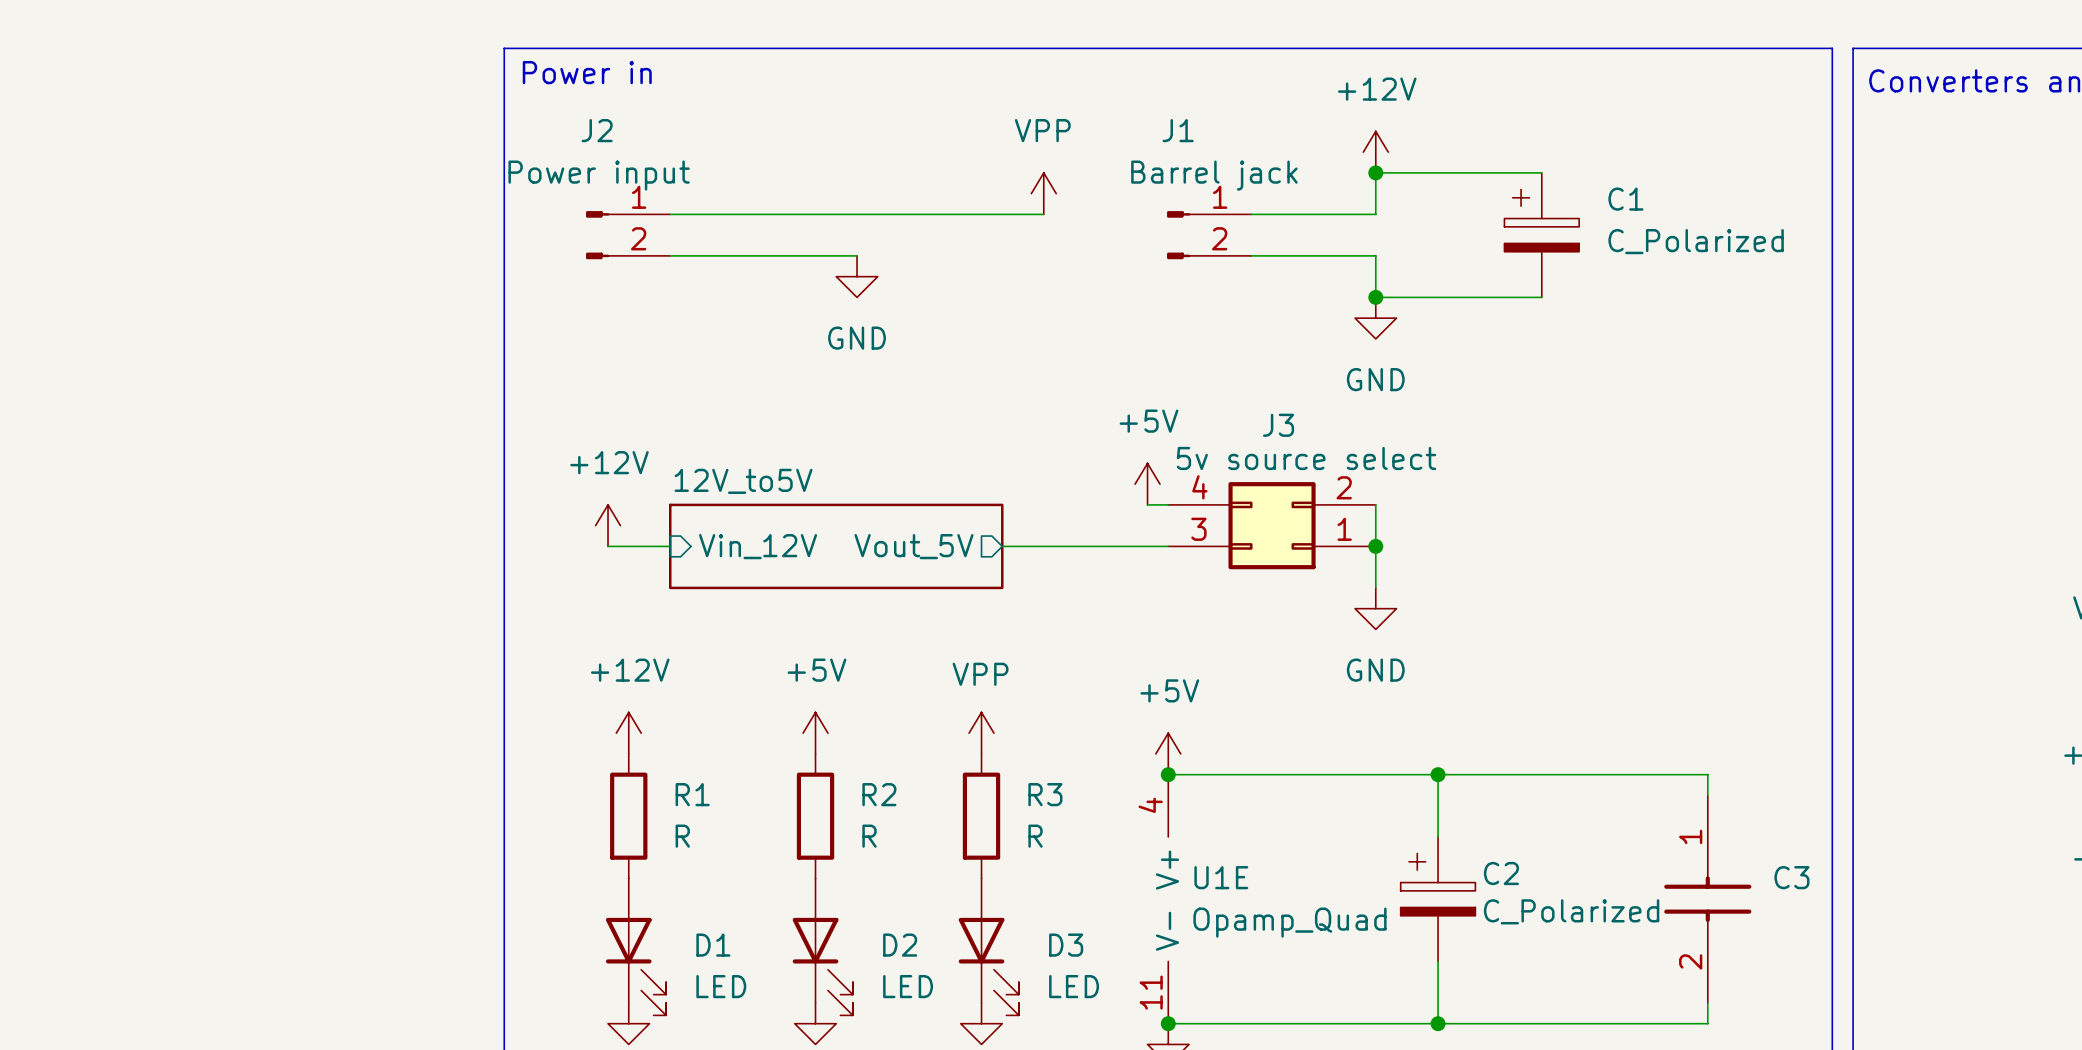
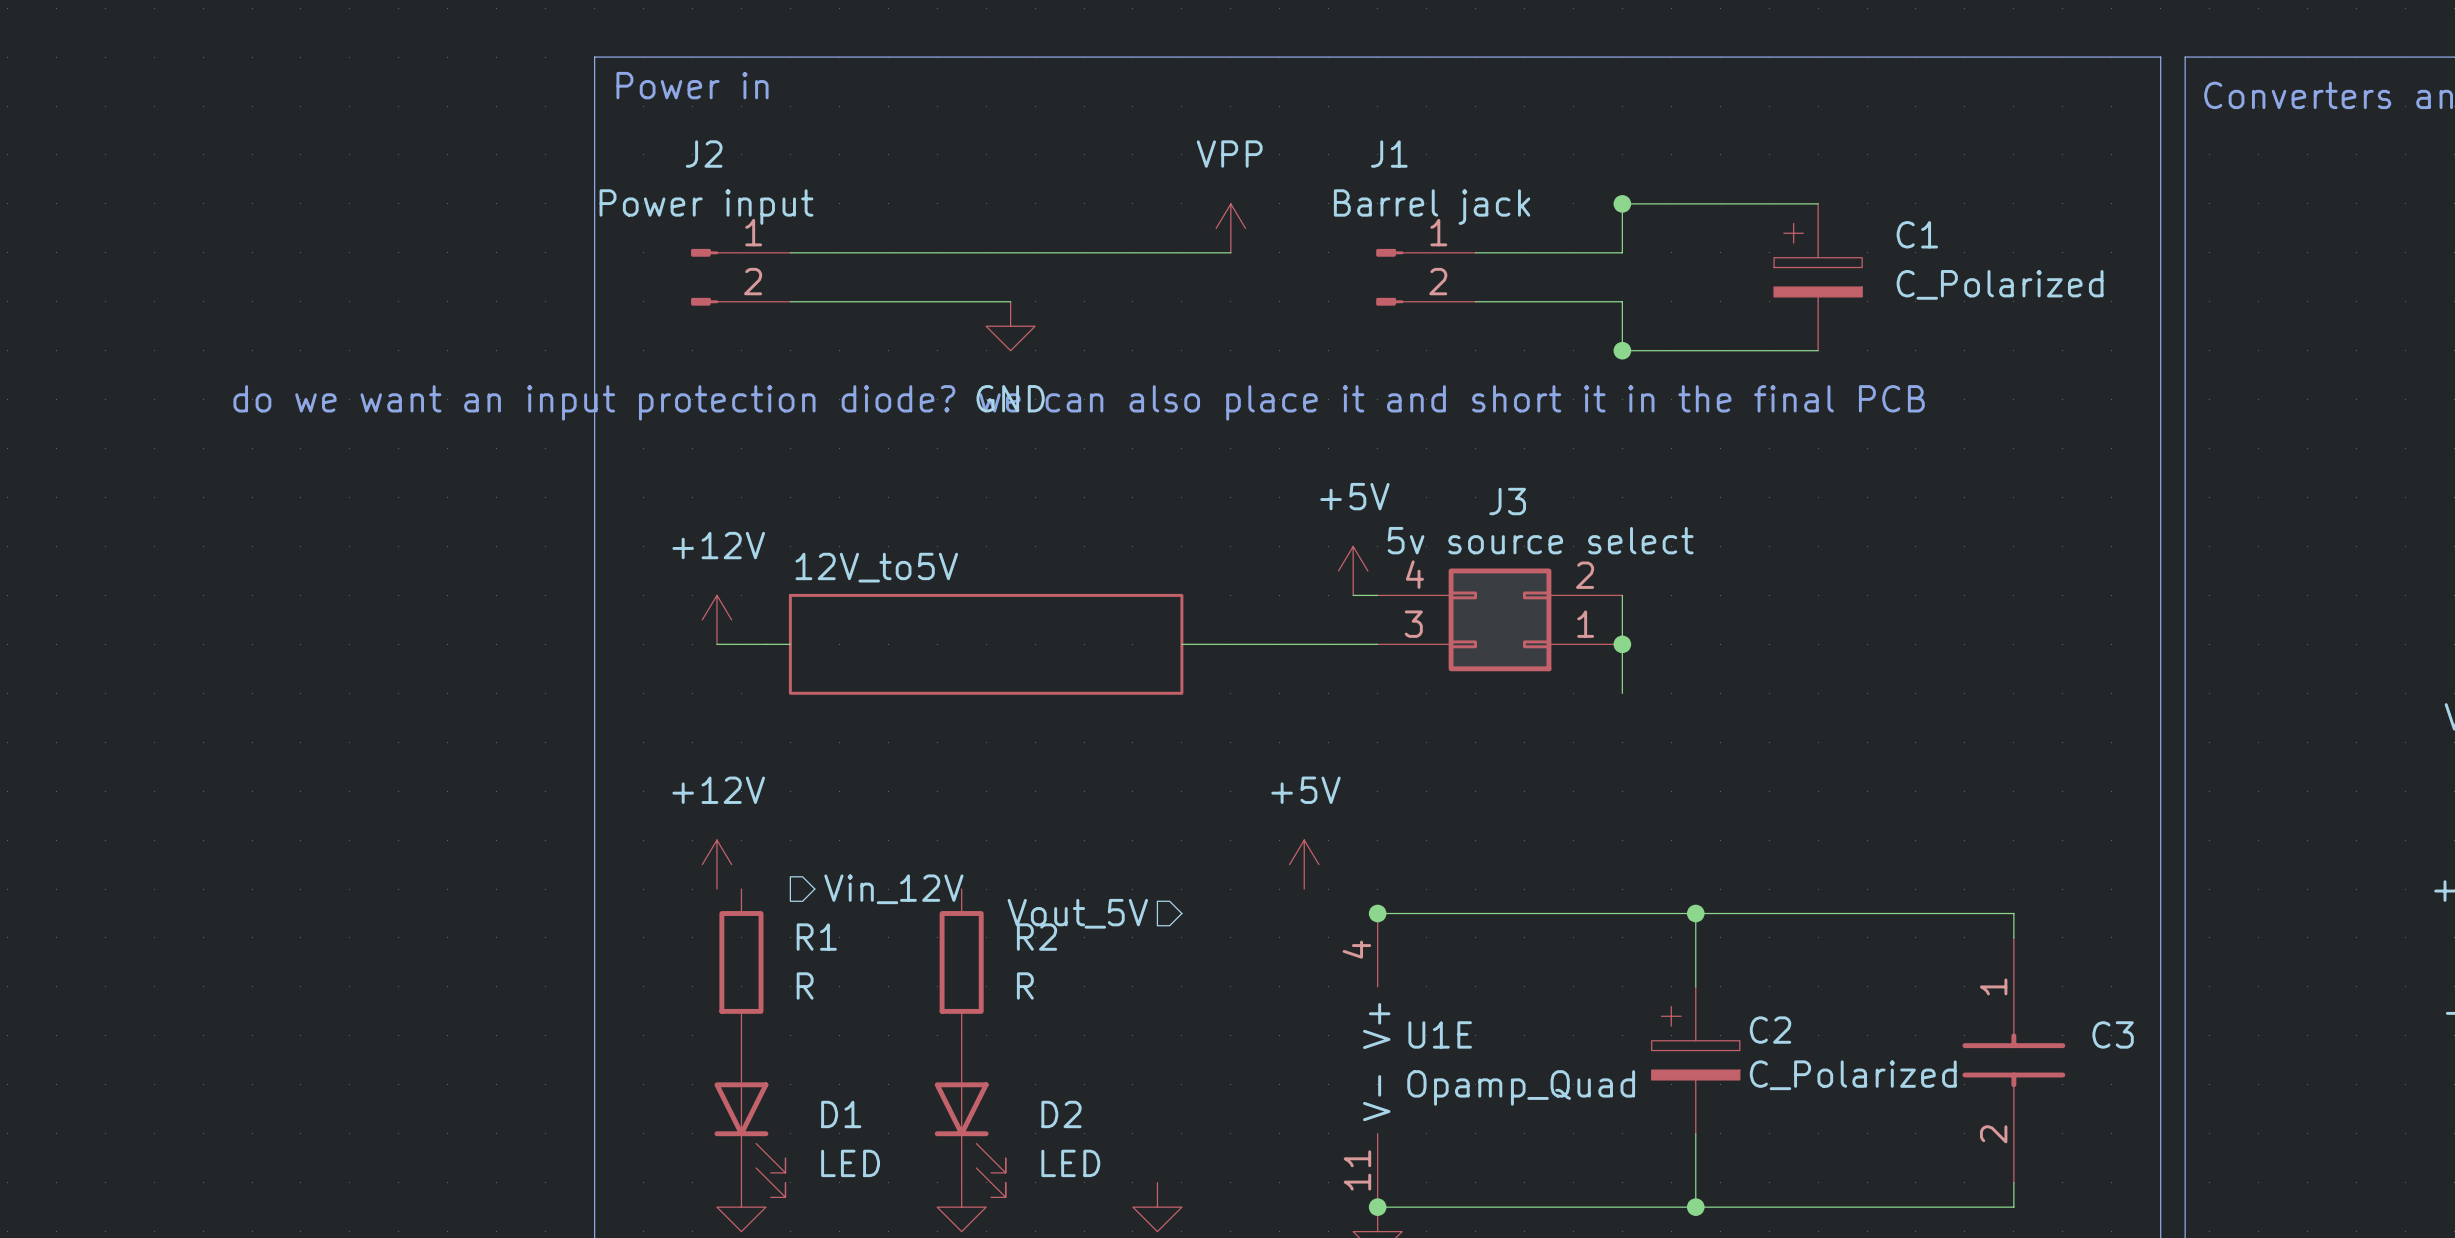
power symbol: +12V (1375, 152) -> none
power symbol: GND (1375, 318) -> none
text: none -> do we want an input protection diode? we can also place it and short it in the final PCB (1079, 402)
sheet pin position: Vin_12V (758, 546) -> Vin_12V (893, 889)
sheet pin position: Vout_5V (914, 546) -> Vout_5V (1077, 913)
power symbol: GND (1375, 608) -> none
power symbol position: +12V (628, 733) -> +12V (716, 864)
power symbol: +5V (815, 733) -> none
power symbol: VPP (981, 733) -> none
power symbol position: +5V (1168, 753) -> +5V (1304, 864)
R3: R (981, 816) -> none
D3: LED (988, 946) -> none

